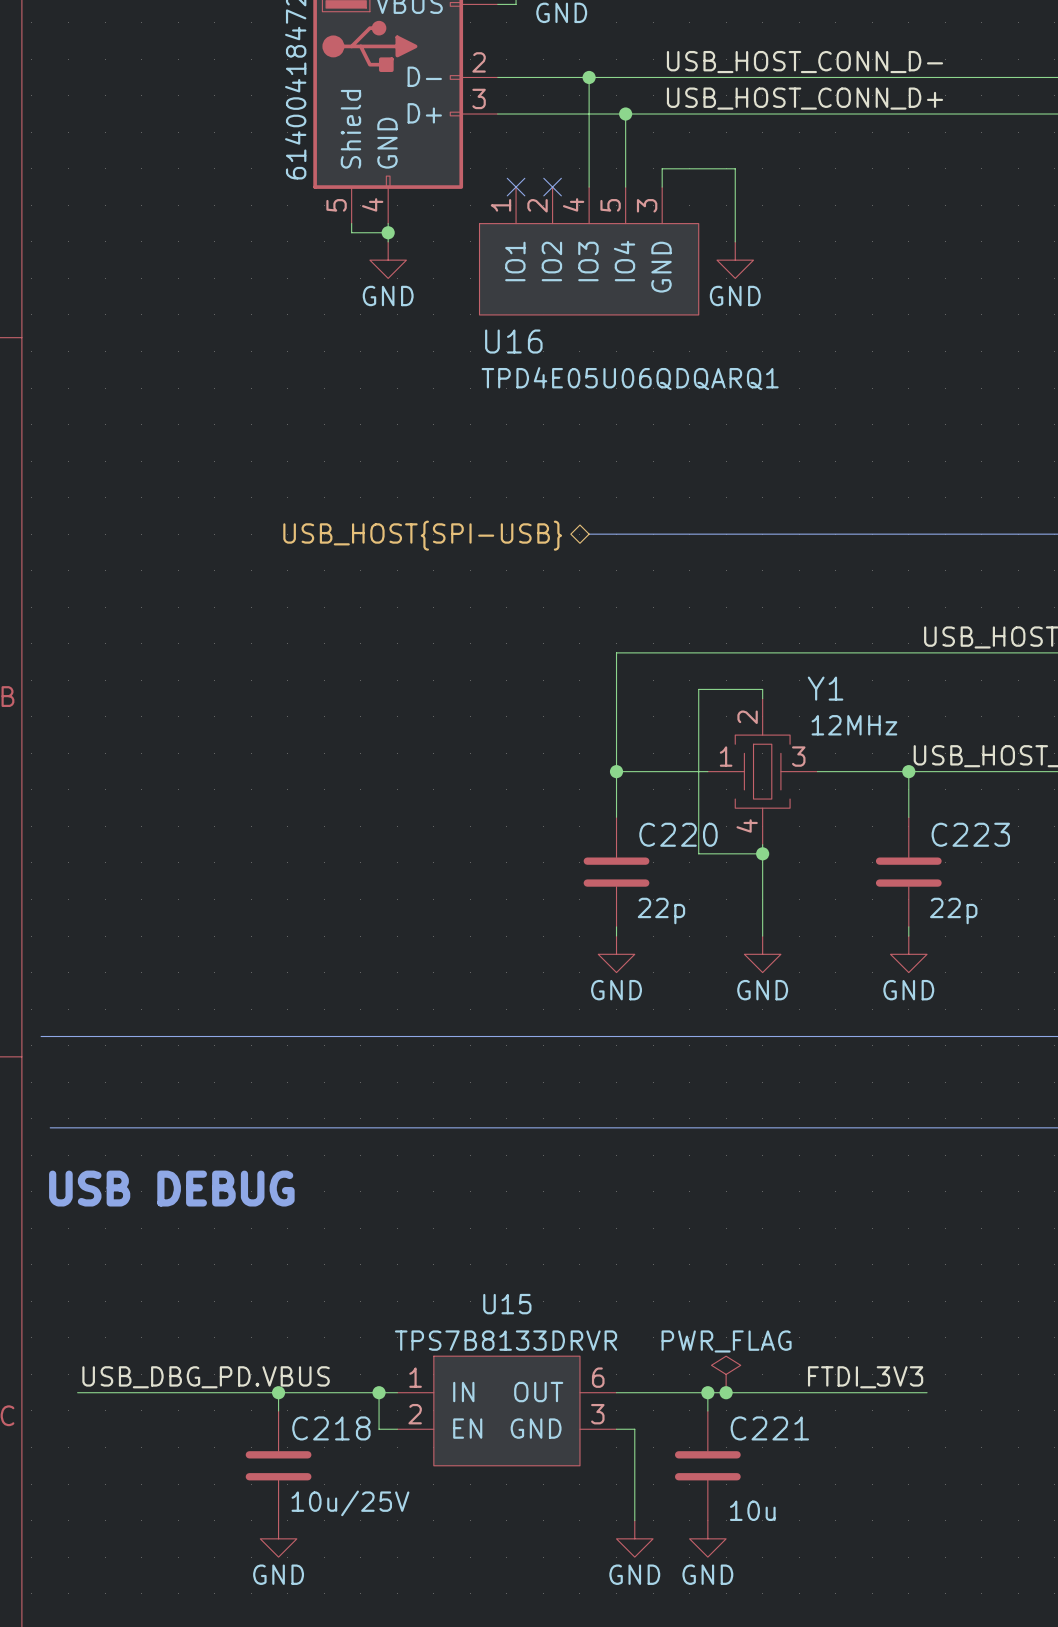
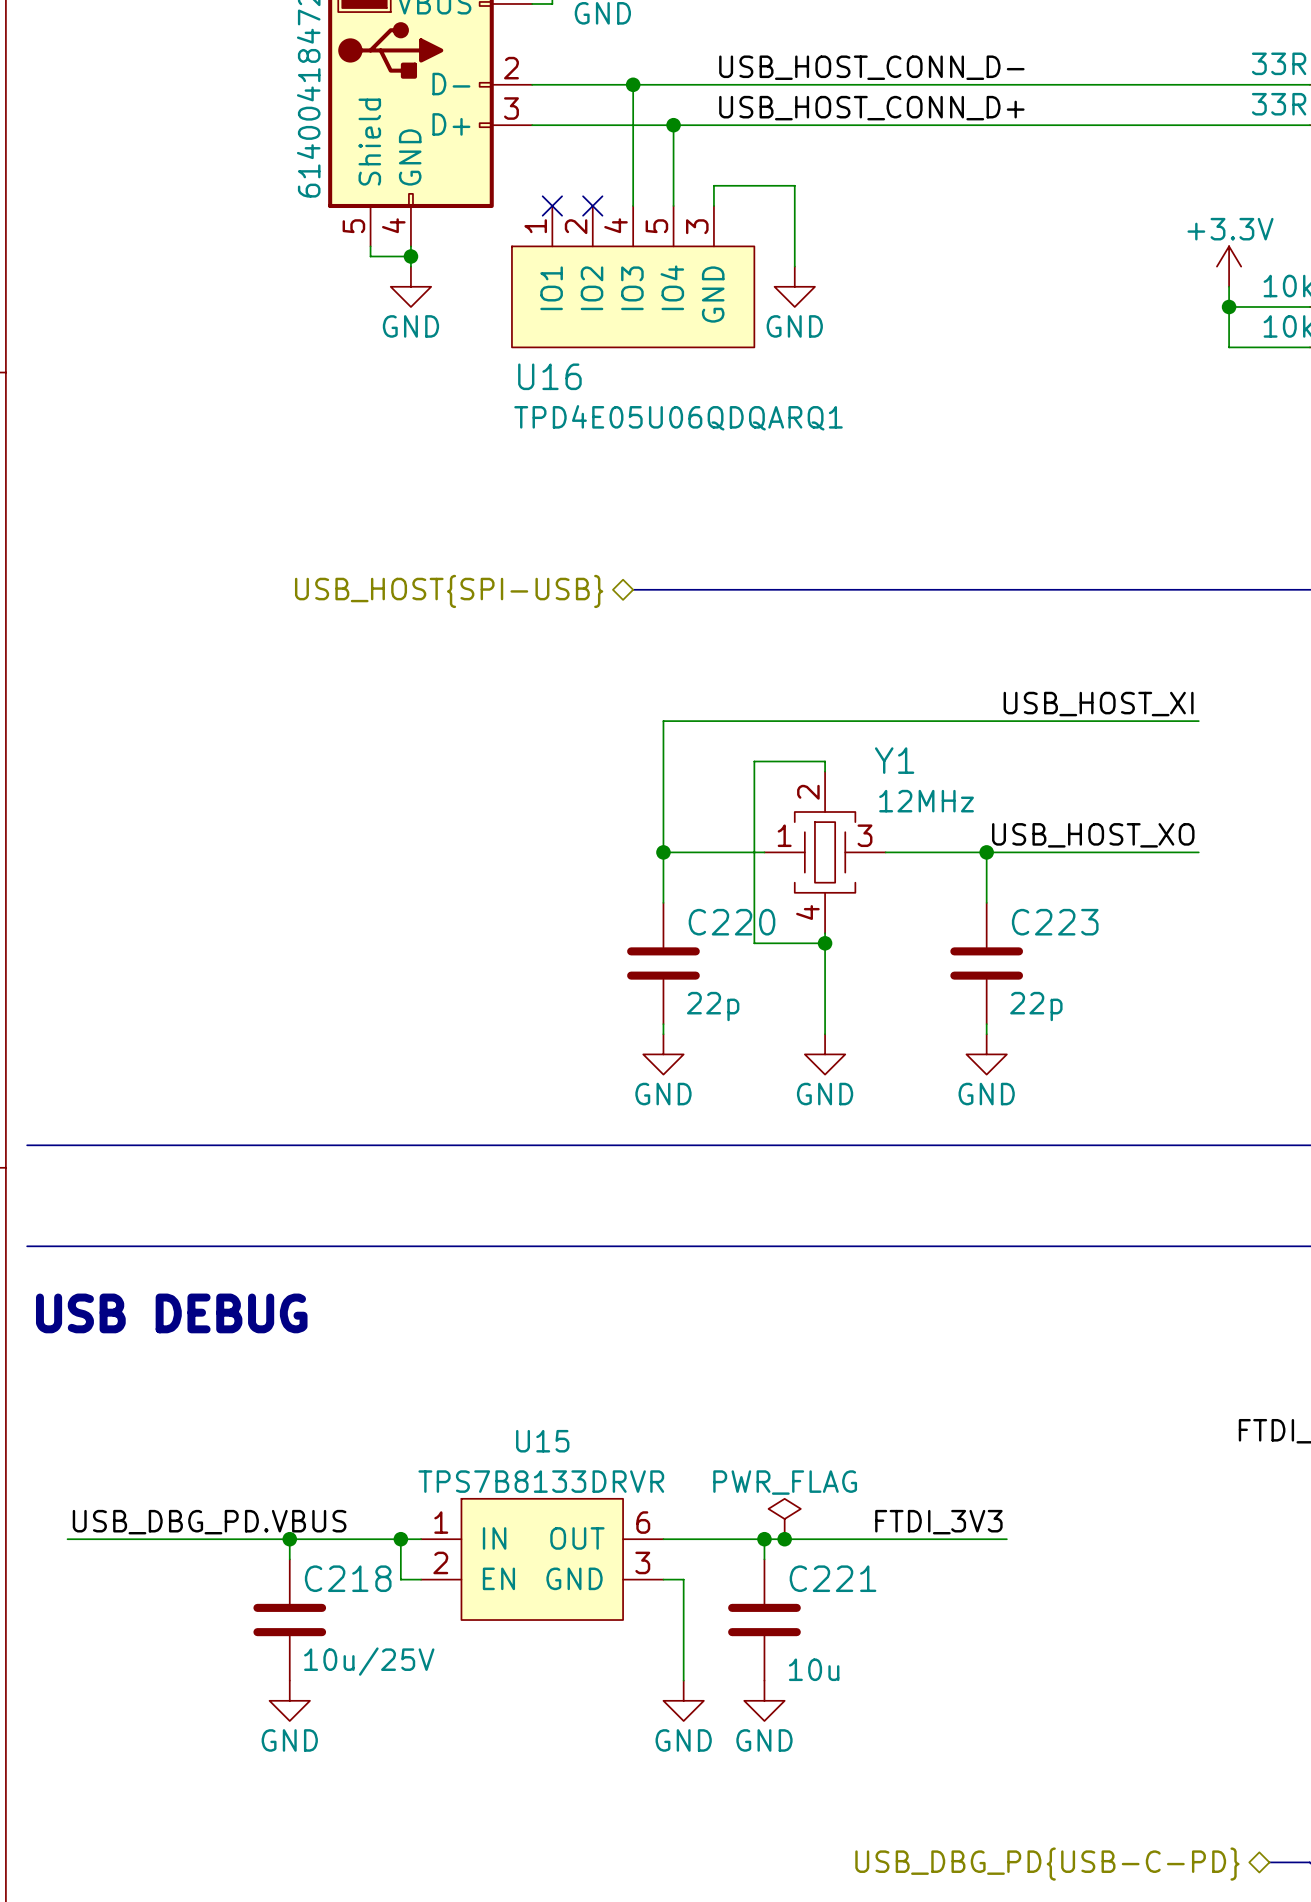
line: none -> (27, 1246) (37, 1246)

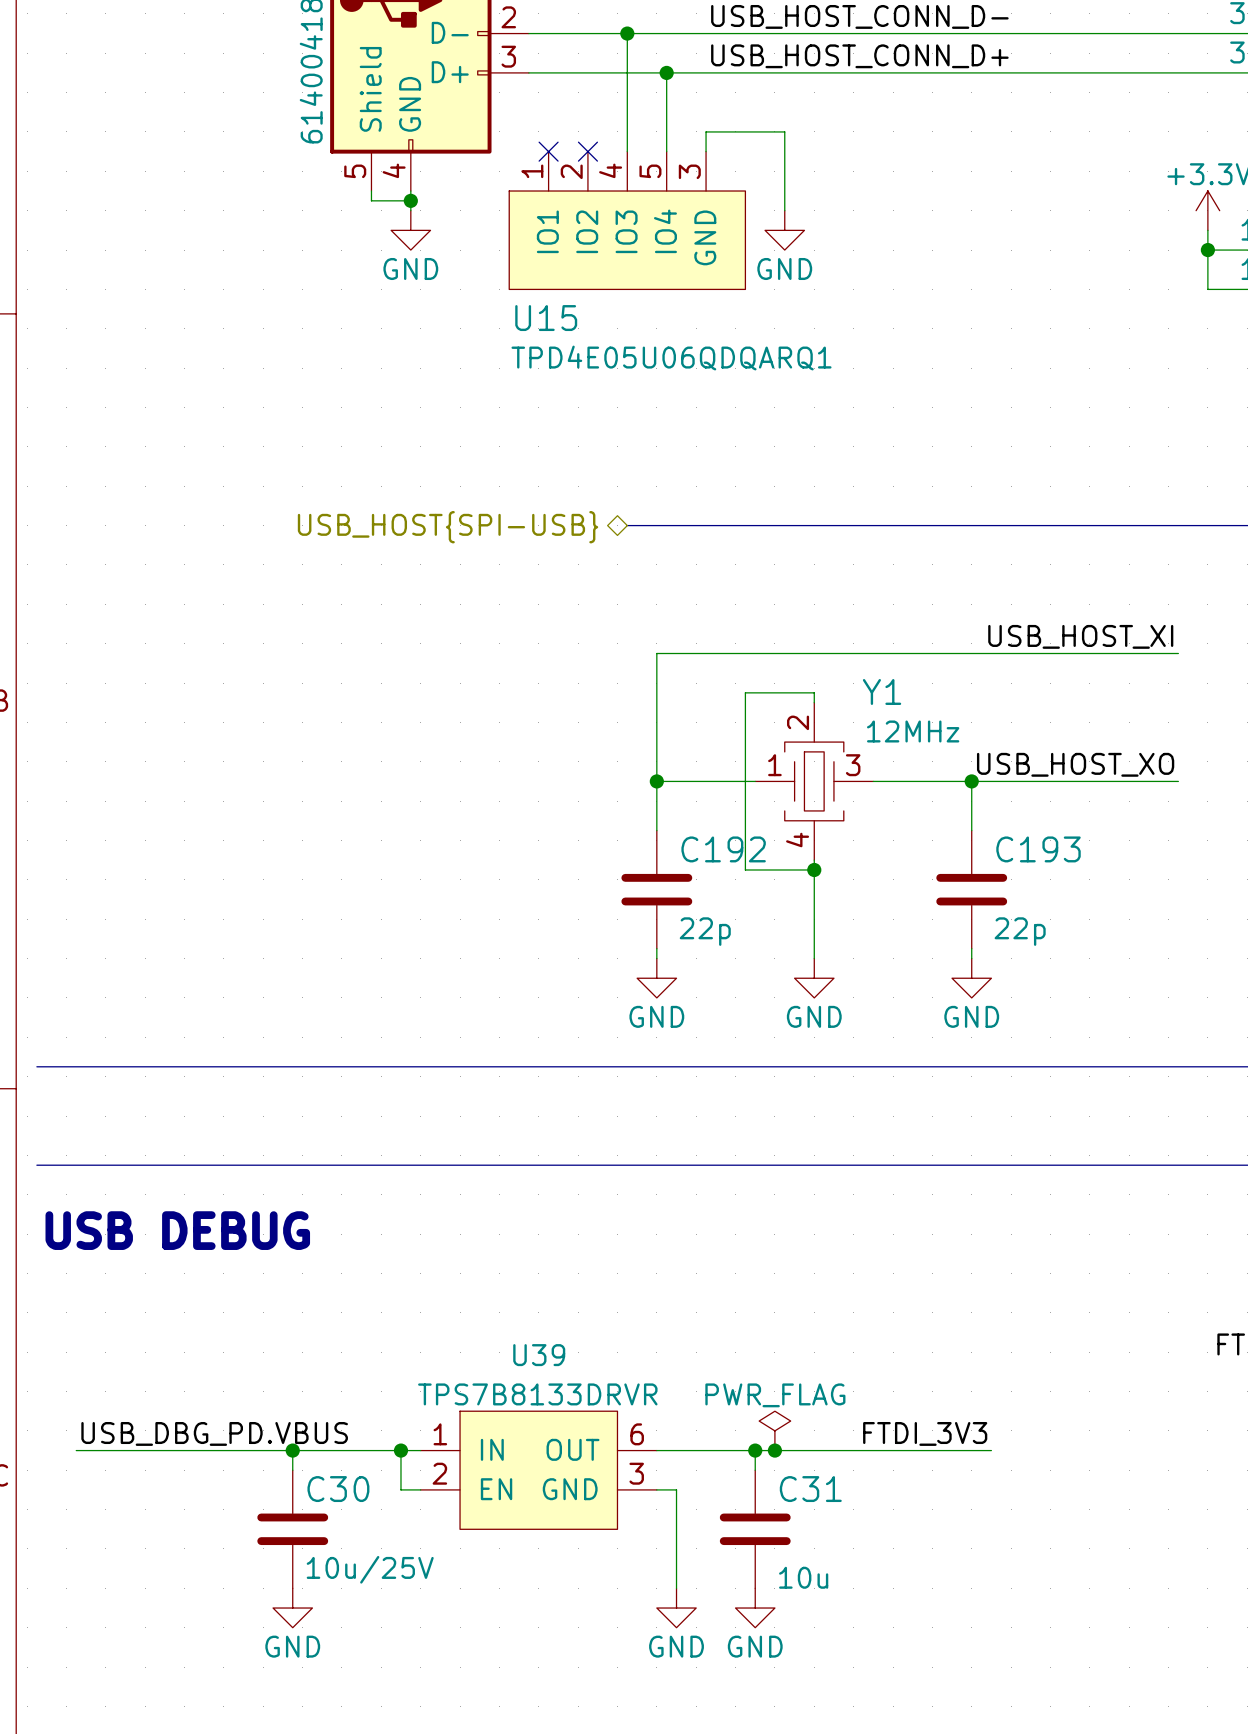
U16 name: U16 (549, 376) -> U15 (546, 318)
C220 name: C220 (732, 922) -> C192 (723, 849)
C223 name: C223 (1055, 922) -> C193 (1038, 849)
U15 name: U15 (542, 1441) -> U39 (539, 1355)
C218 name: C218 (348, 1578) -> C30 (338, 1489)
C221 name: C221 (833, 1578) -> C31 (810, 1489)

